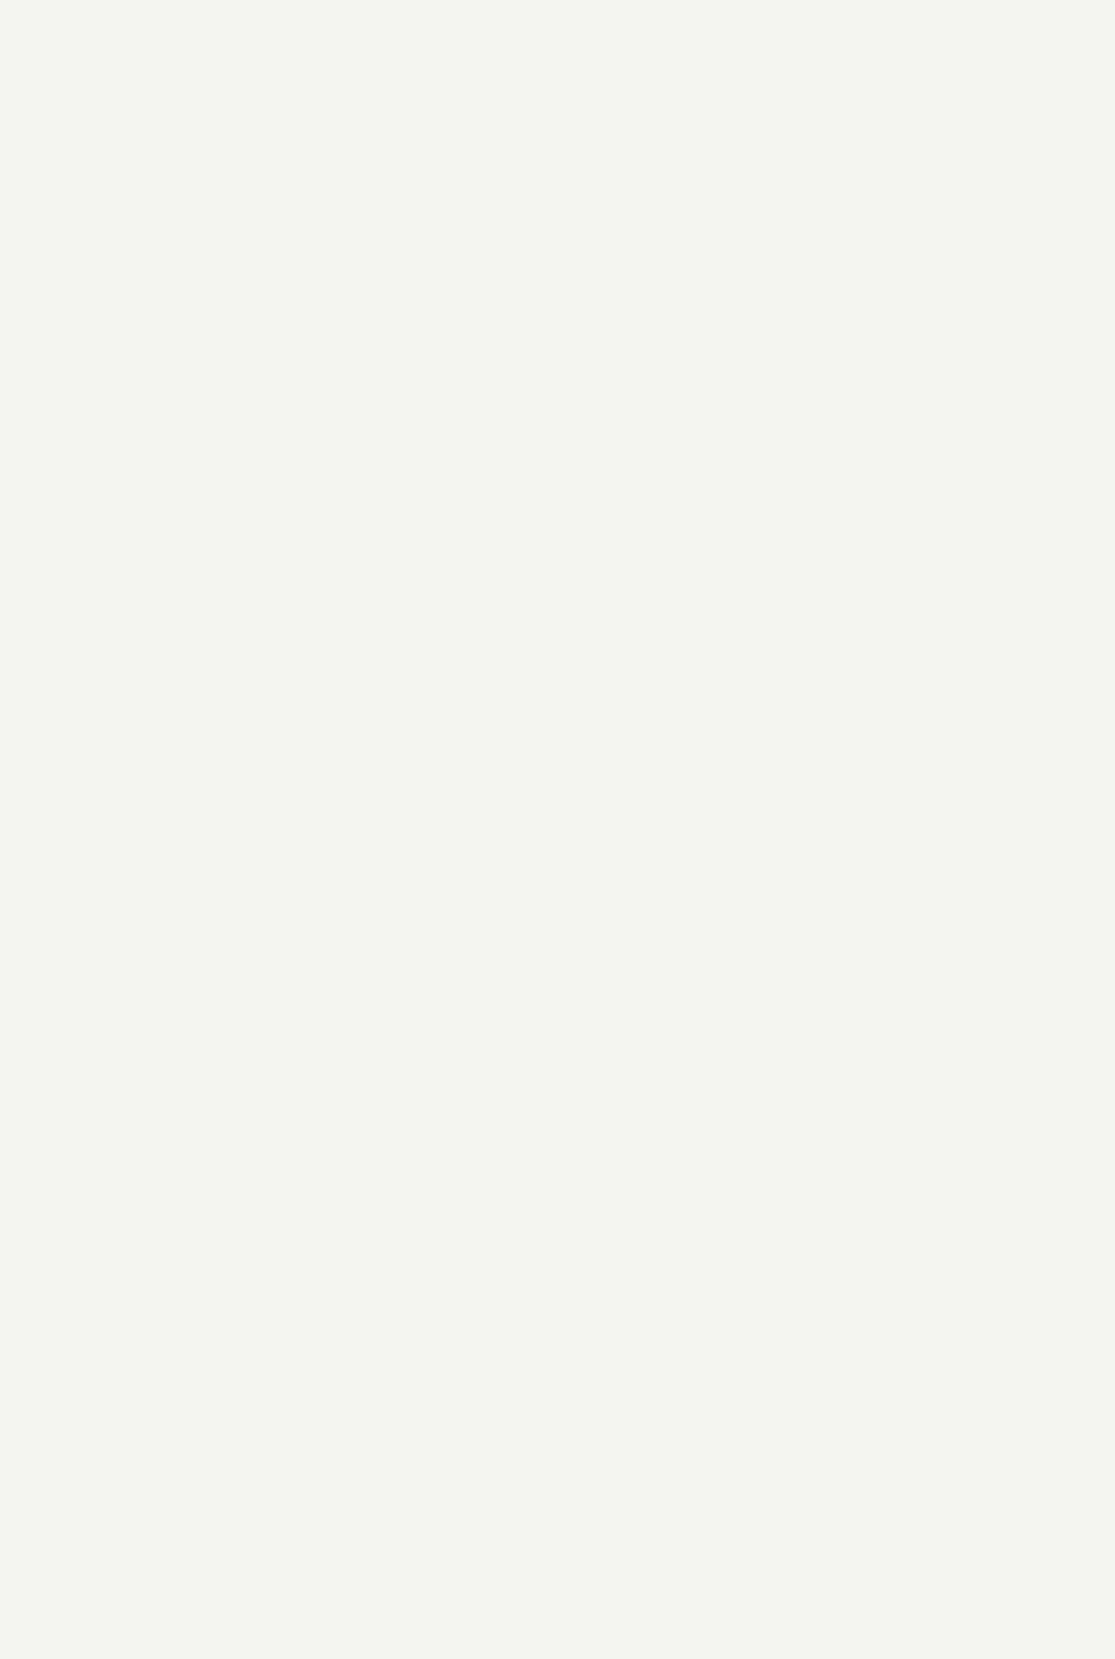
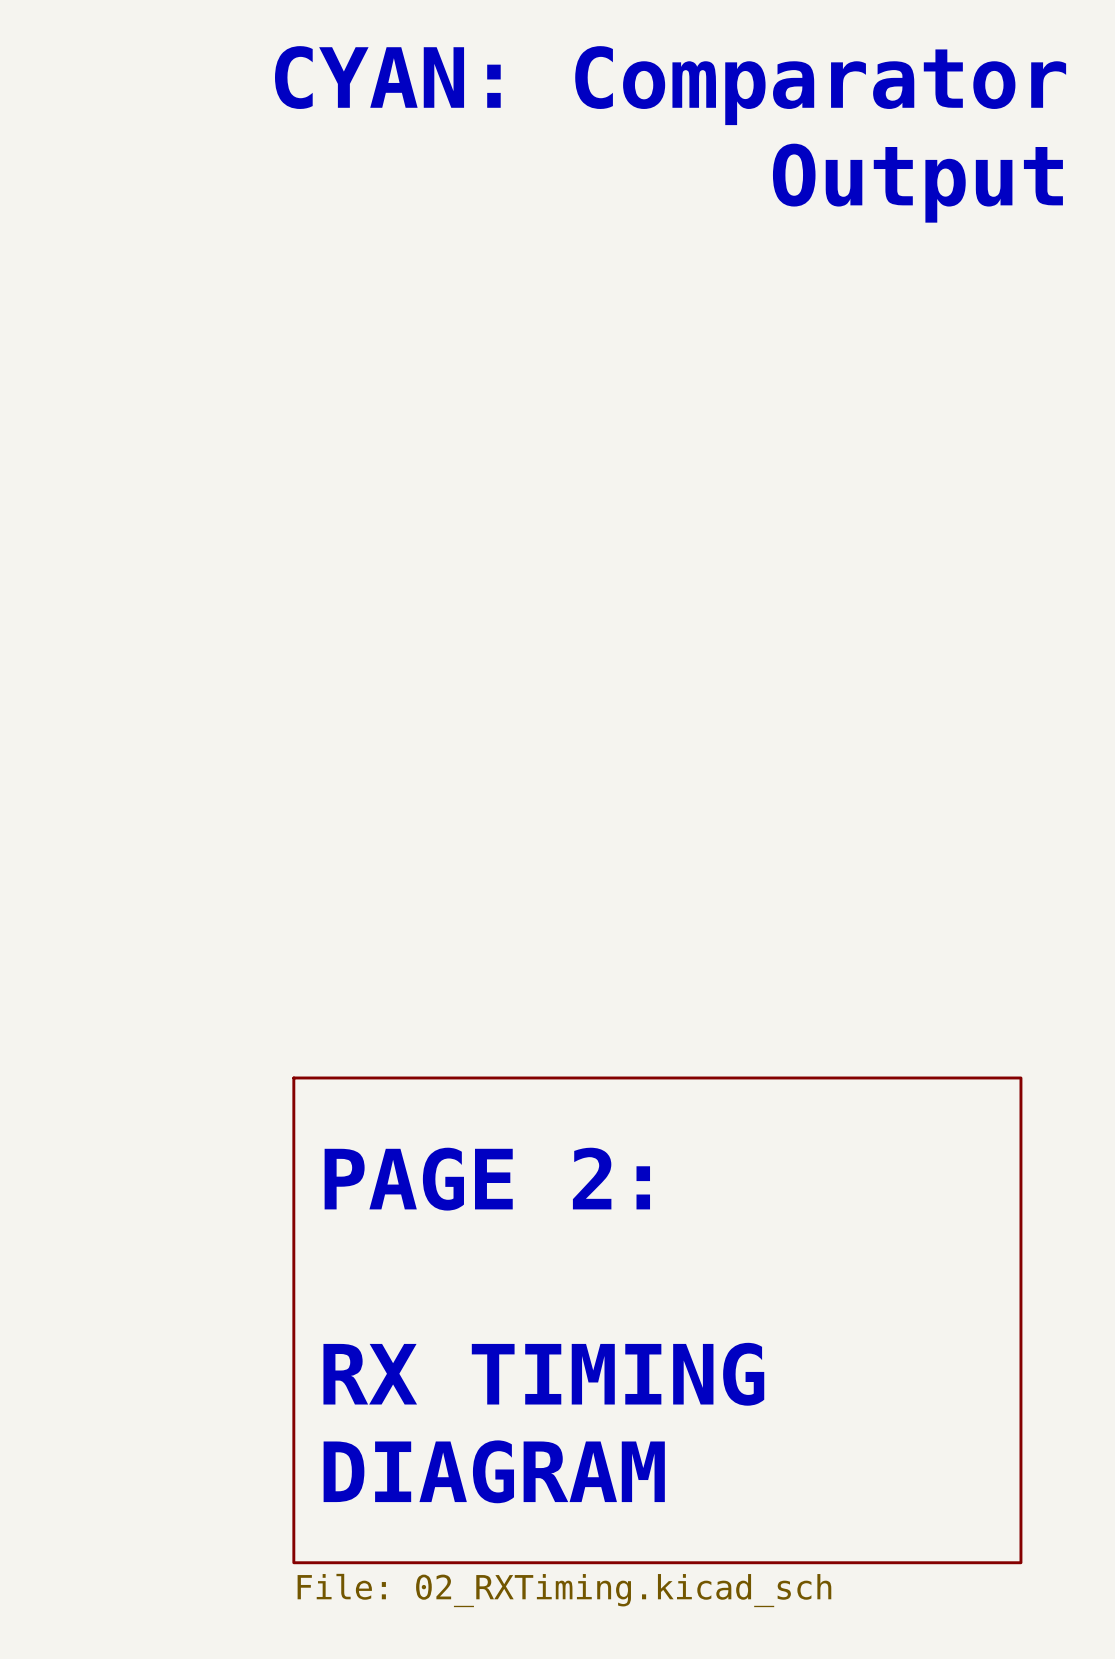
text: none -> CYAN: Comparator (670, 85)
text: none -> Output (917, 183)
text: none -> PAGE 2: (487, 1179)
sheet: none -> File: 02_RXTiming.kicad_sch (657, 1320)
text: none -> RX TIMING (543, 1374)
text: none -> DIAGRAM (494, 1471)

